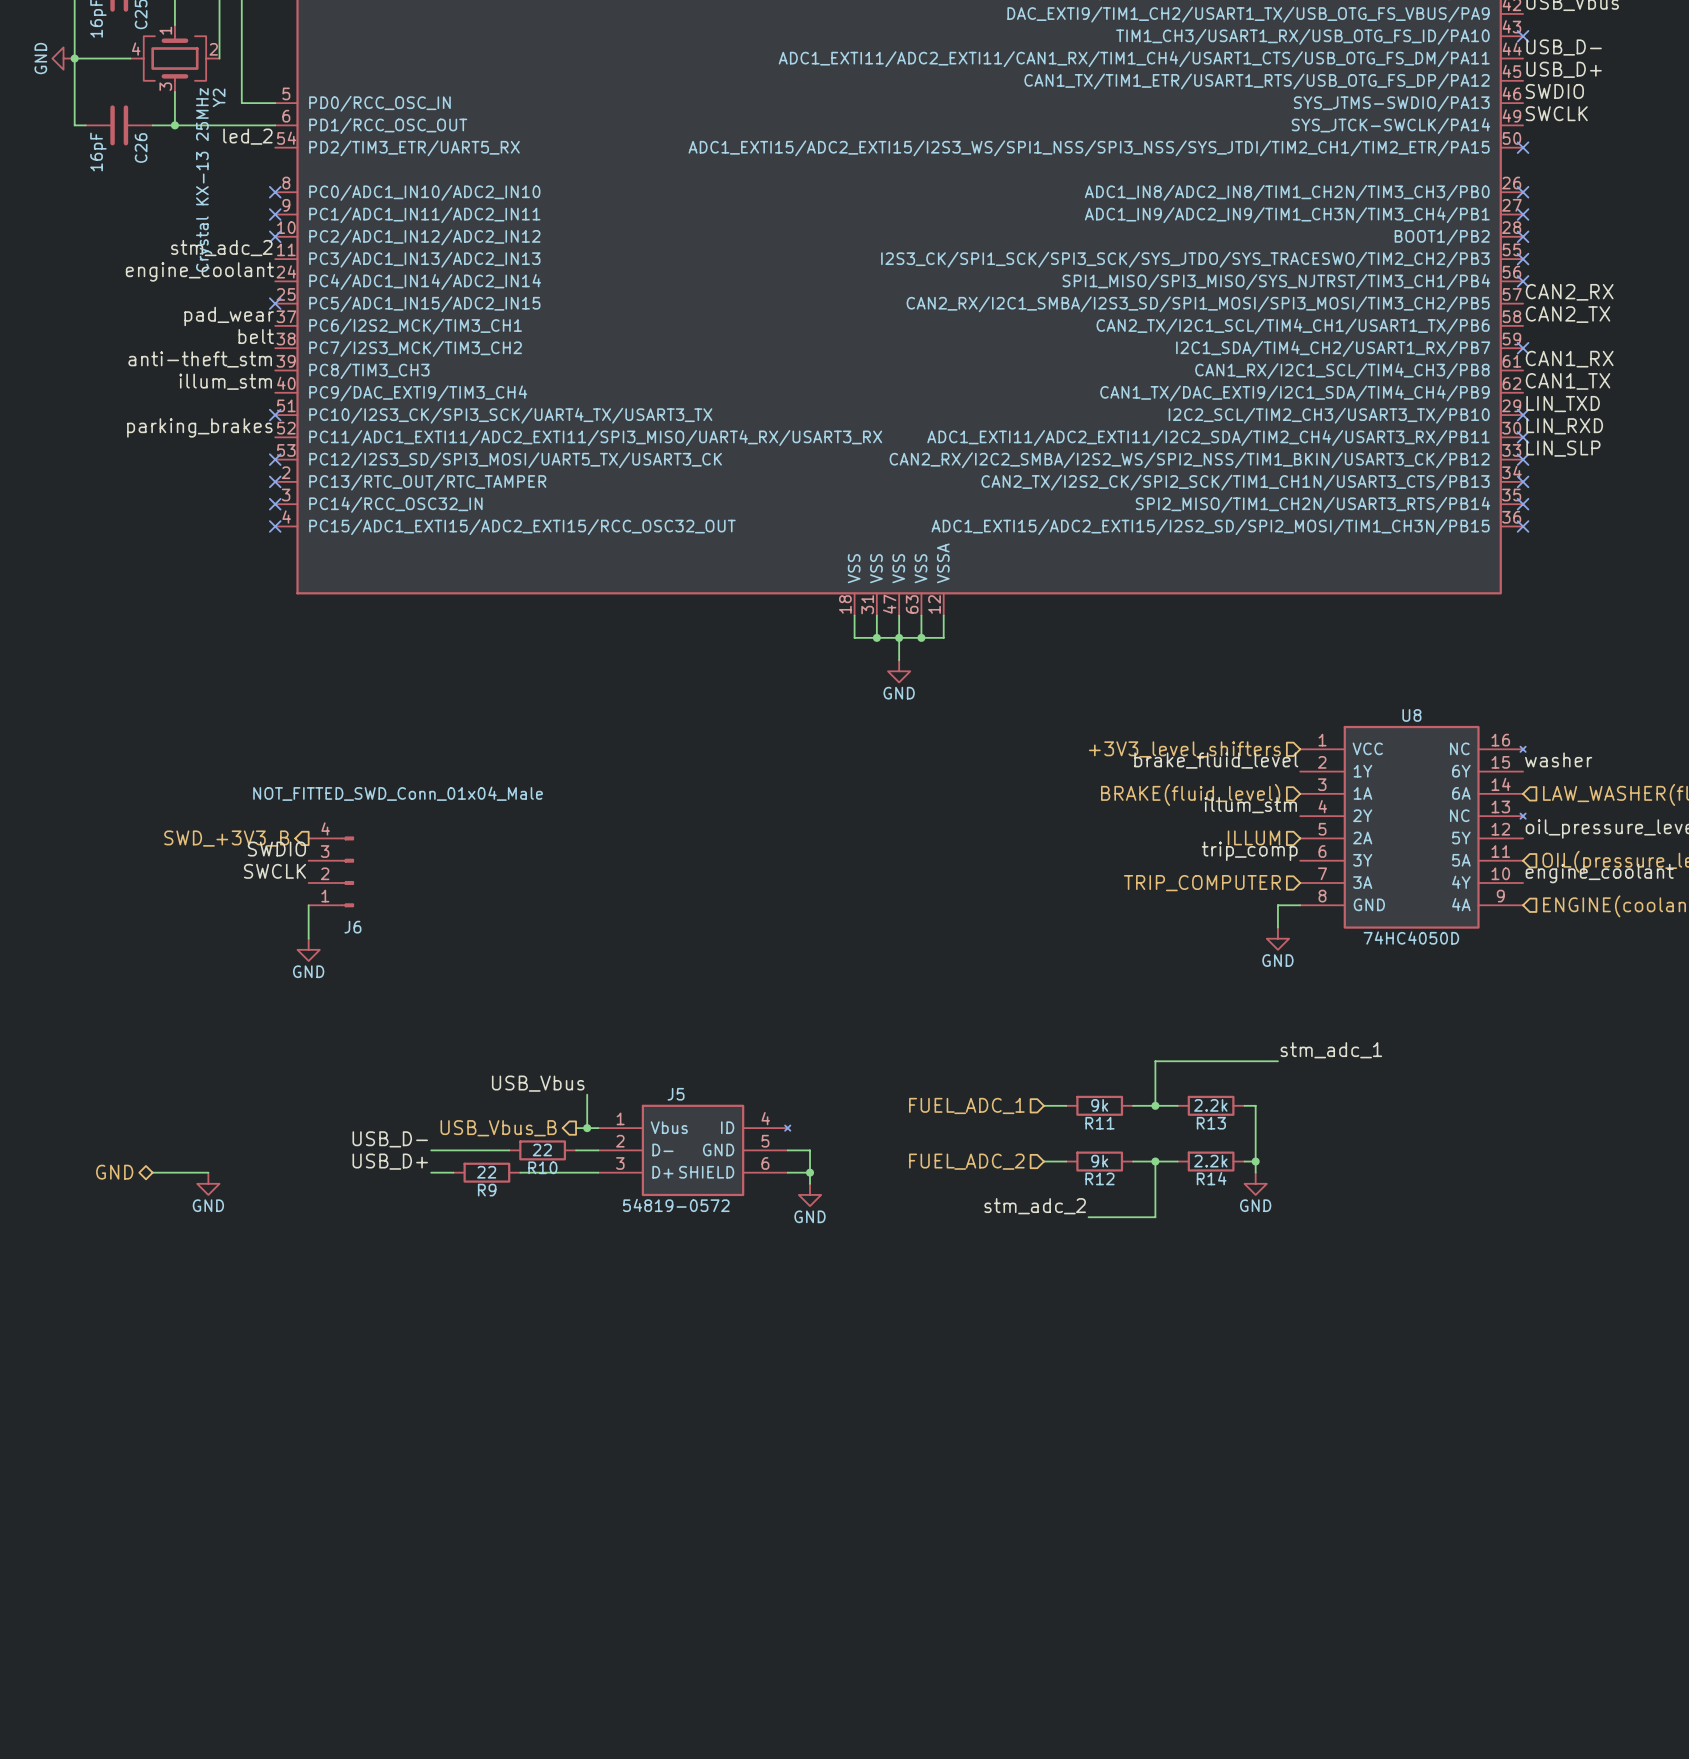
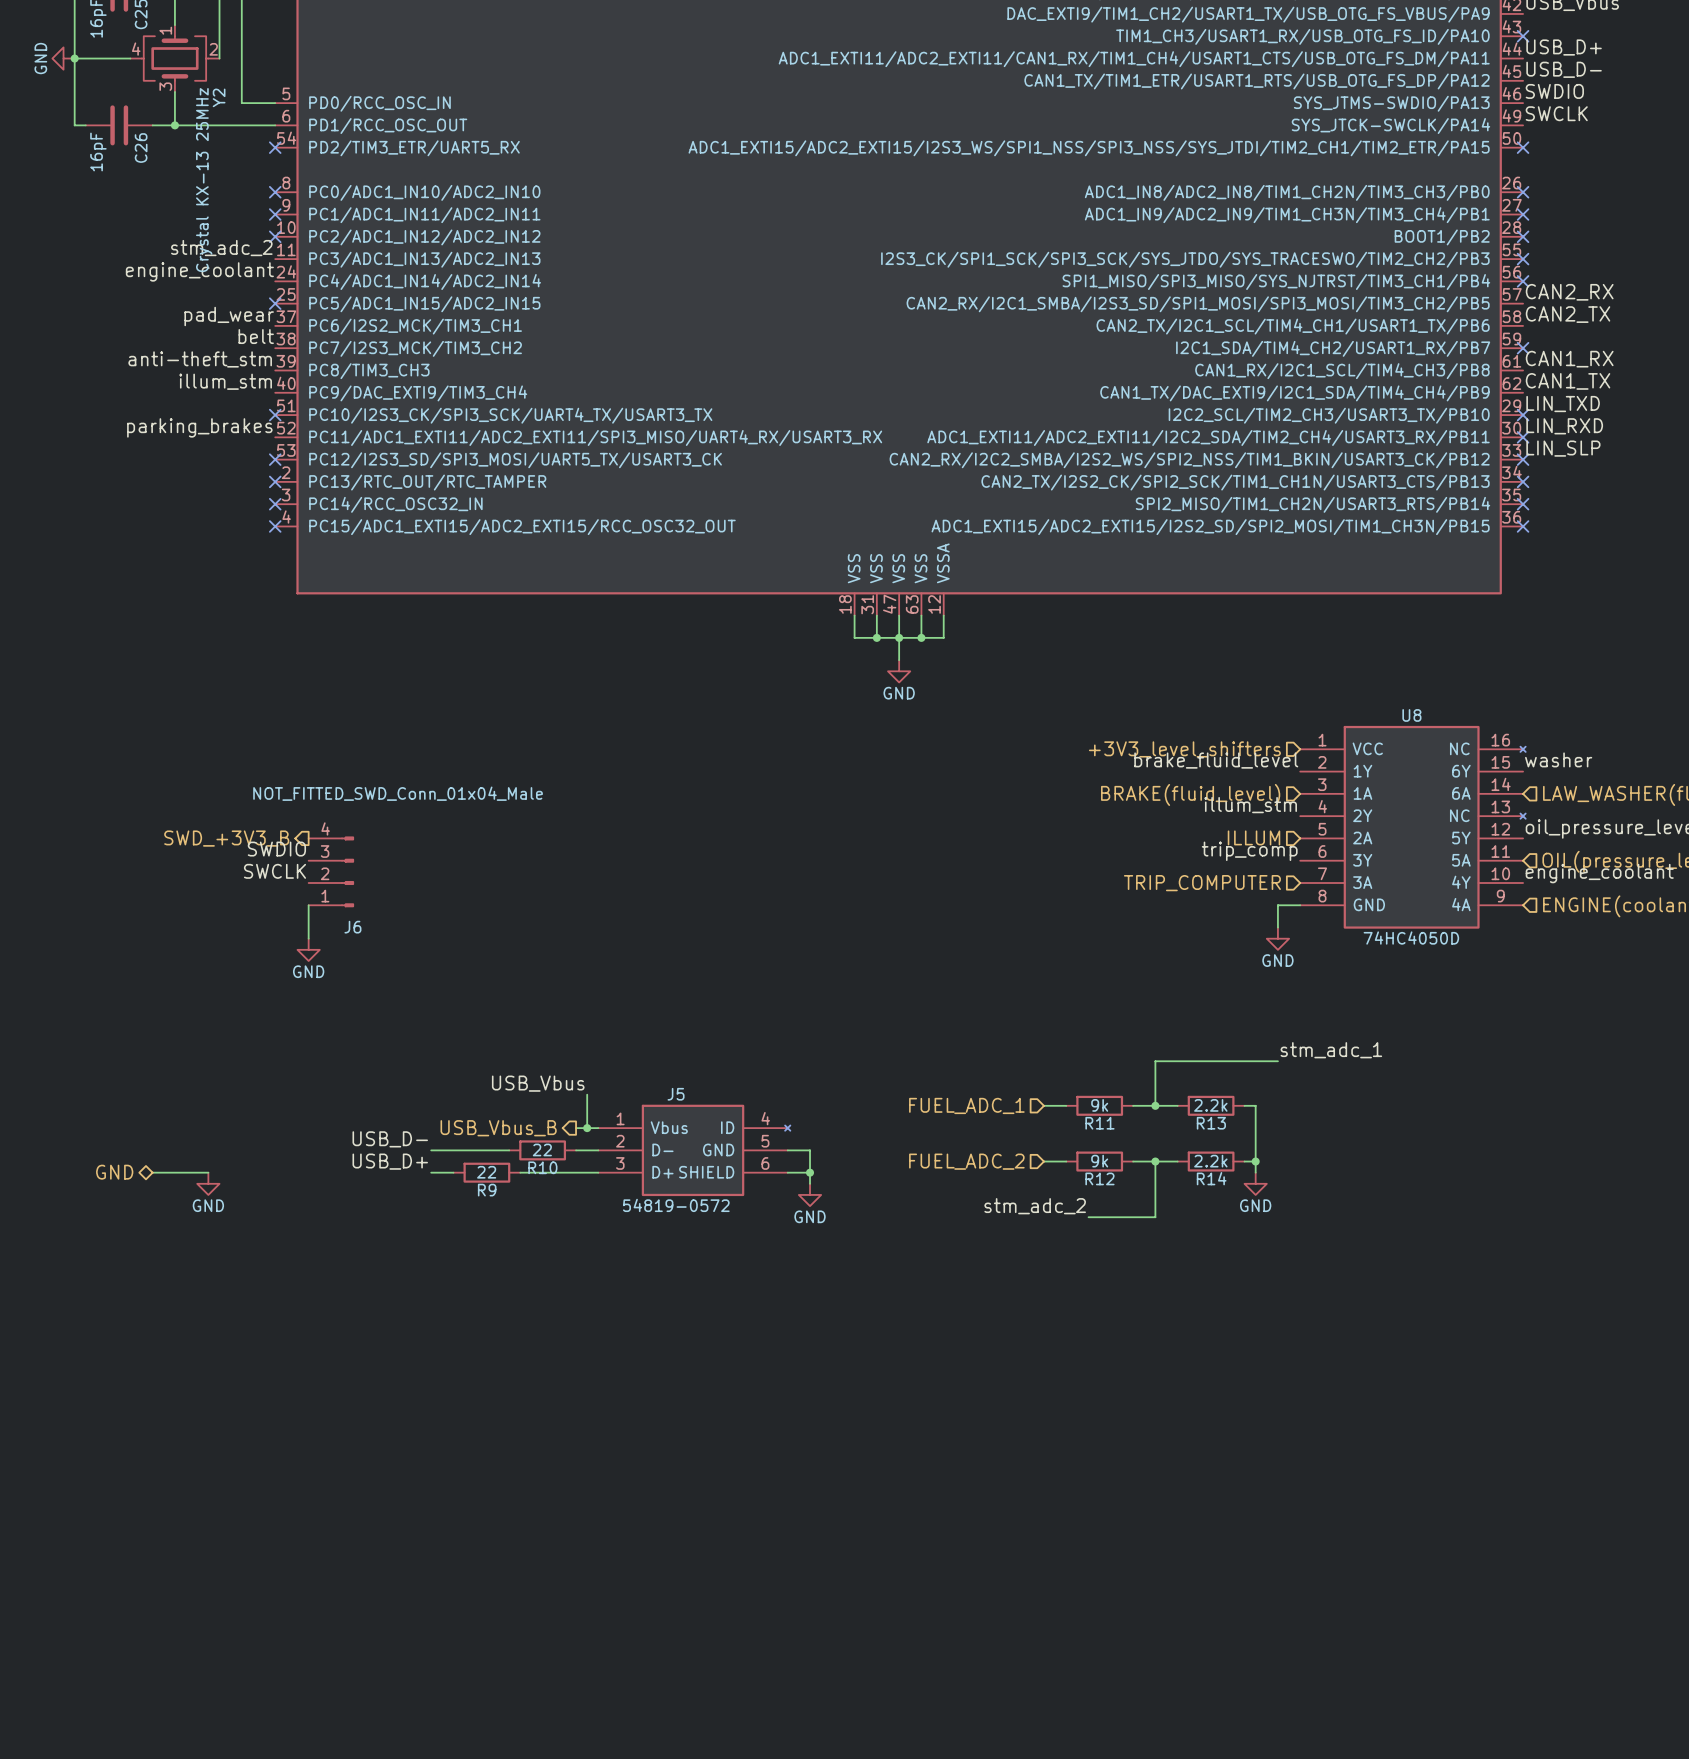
label: USB_D- (1564, 47) -> USB_D+ (1564, 47)
label: USB_D+ (1564, 69) -> USB_D- (1564, 69)
label: led_2 (247, 136) -> none
no-connect mark: none -> (275, 147)

